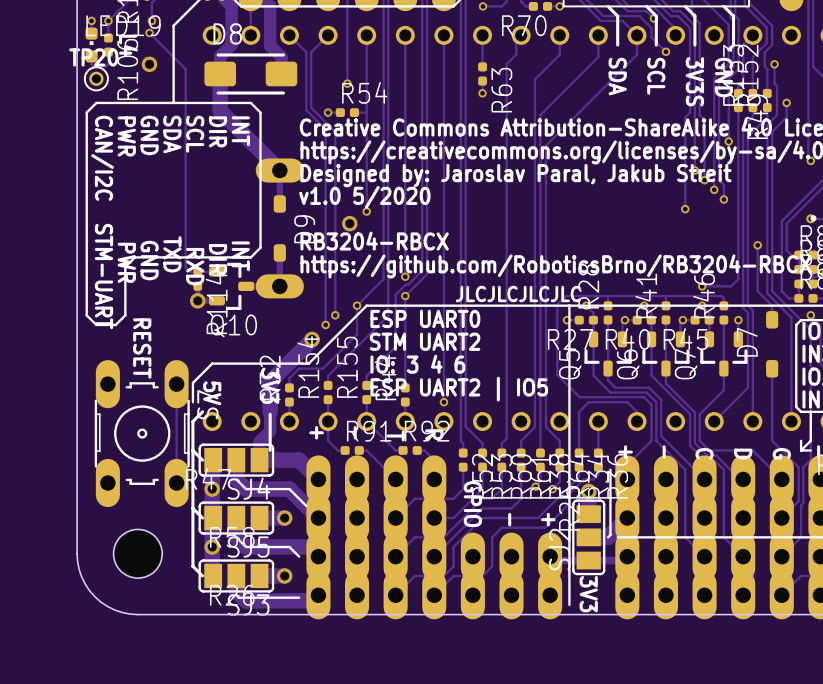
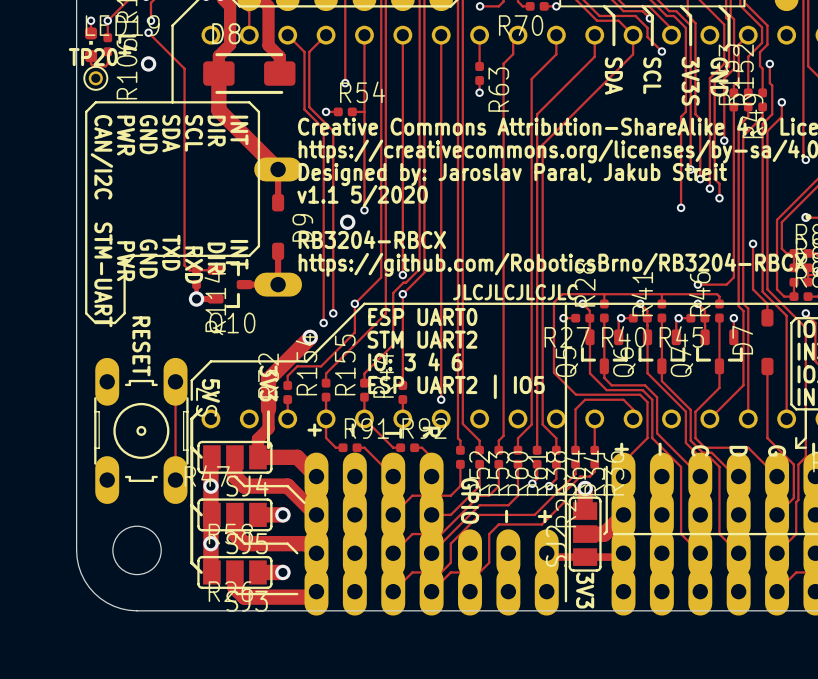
text: v1.0 5/2020 (364, 197) -> v1.1 5/2020 (362, 196)

